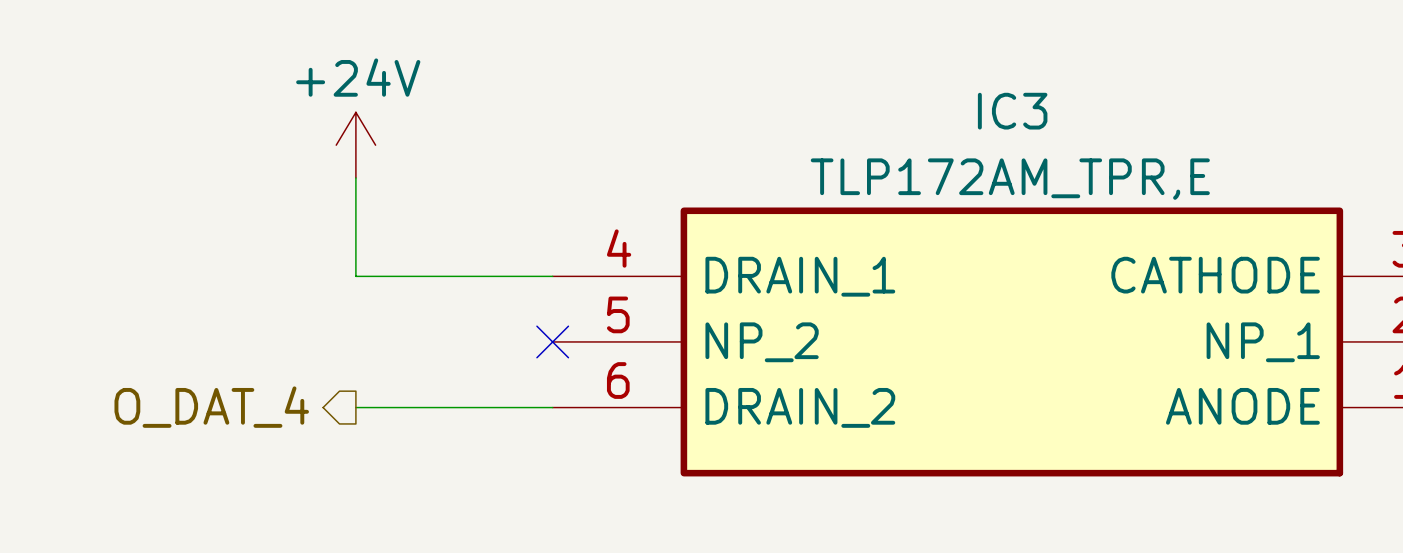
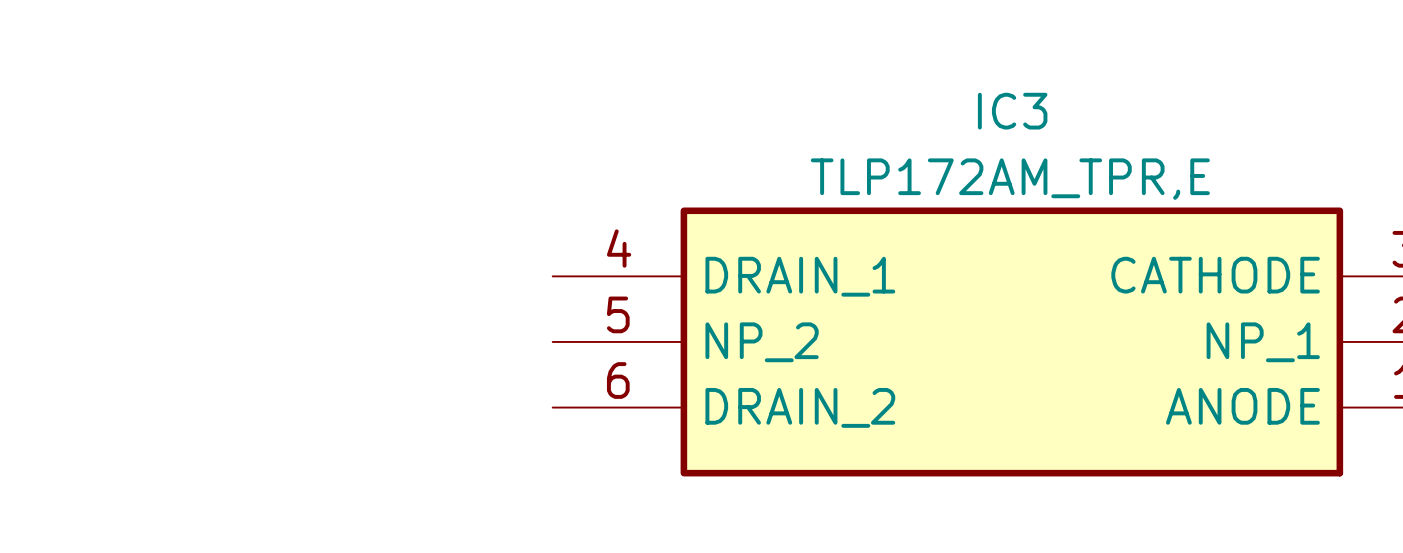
power symbol: +24V (355, 145) -> none
wire: (355, 177) (355, 276) (552, 276) -> none
no-connect mark: (552, 341) -> none
hierarchical label: O_DAT_4 (211, 407) -> none
wire: (355, 407) (552, 407) -> none

